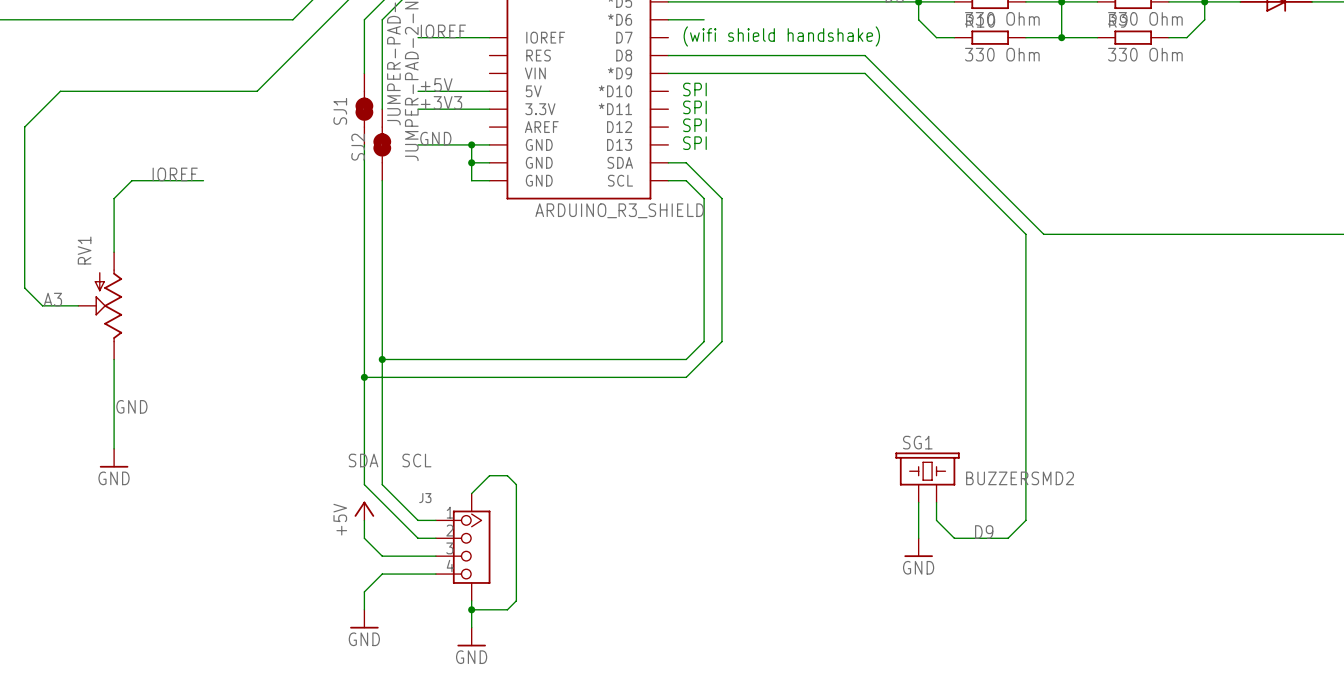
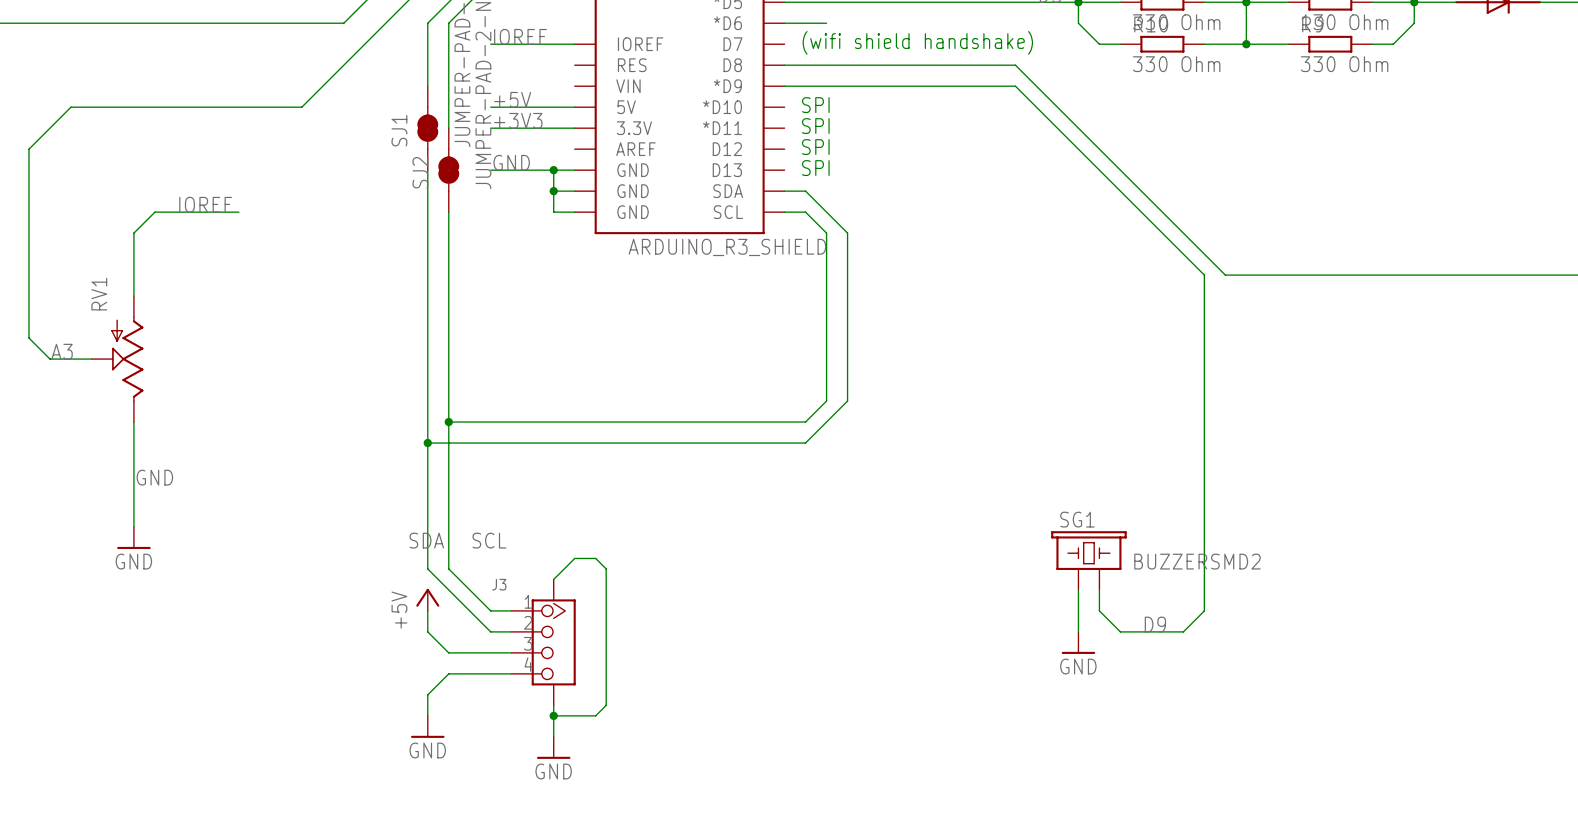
part value: 330 Ohm (1145, 18) -> 130 Ohm (1344, 22)

